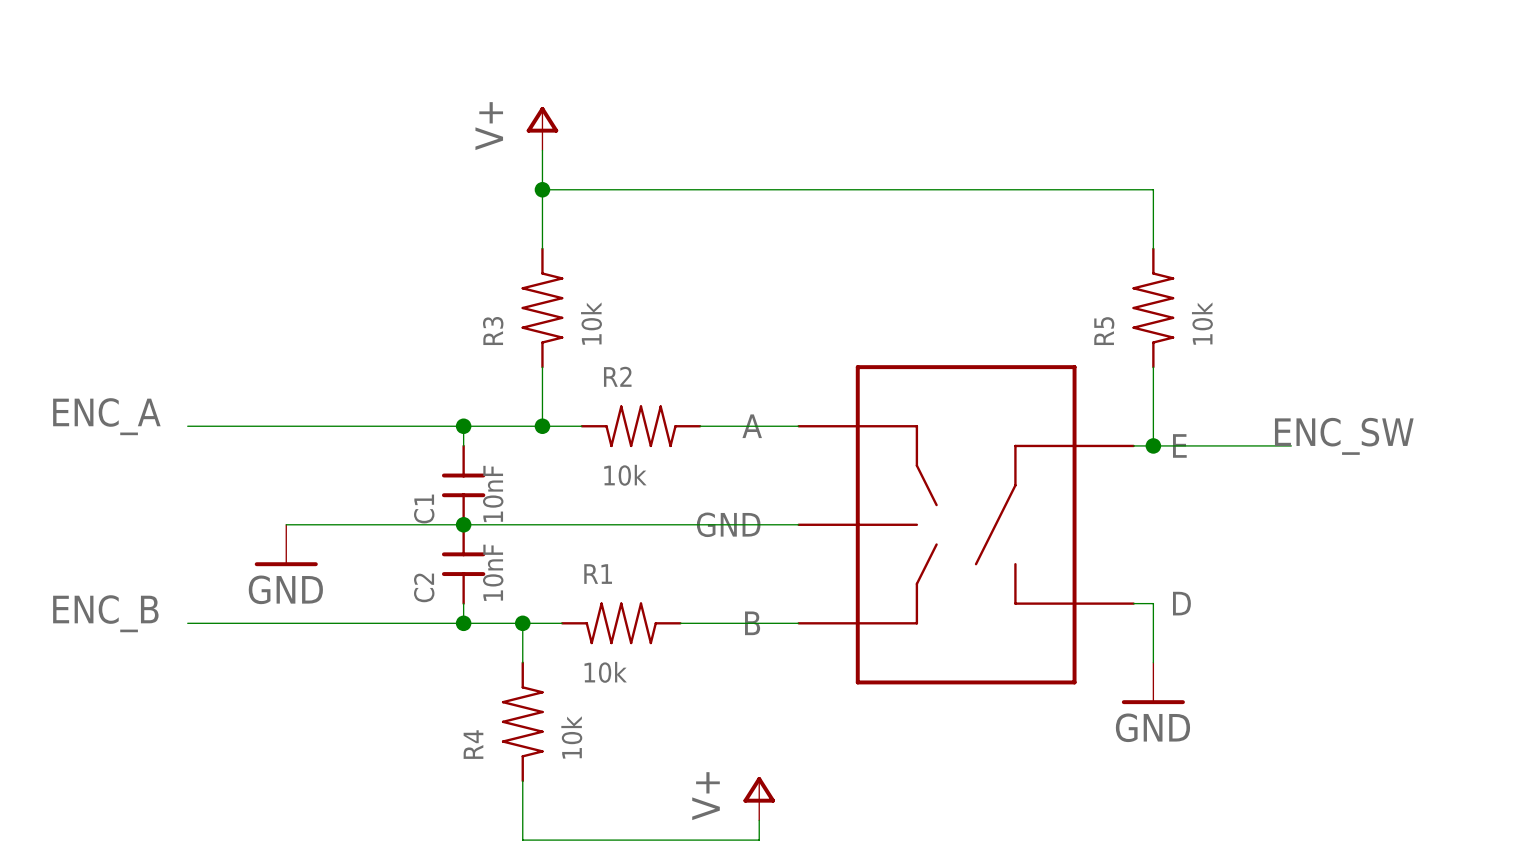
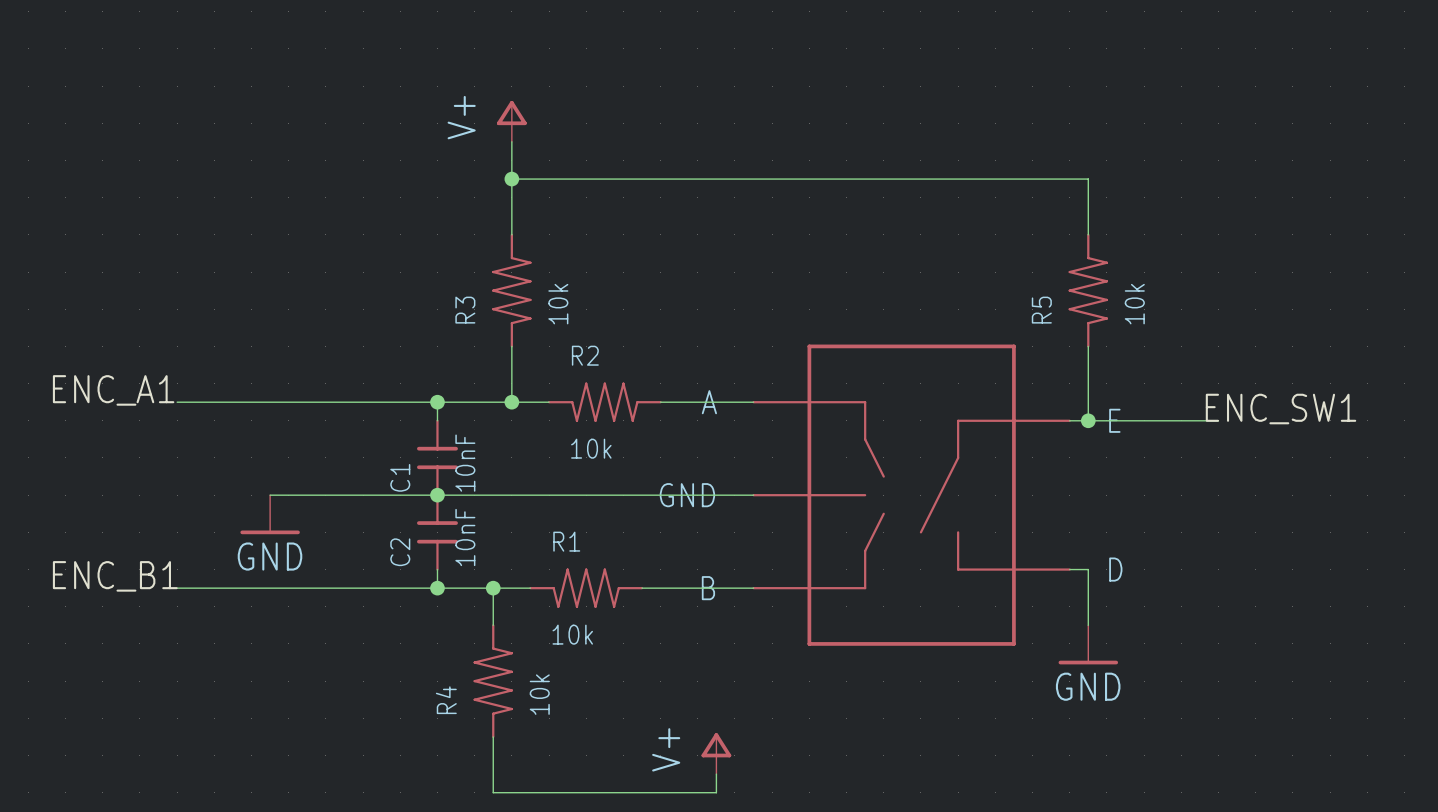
label: ENC_A (106, 416) -> ENC_A1 (113, 390)
label: ENC_SW (1344, 436) -> ENC_SW1 (1281, 409)
label: ENC_B (105, 613) -> ENC_B1 (115, 576)

